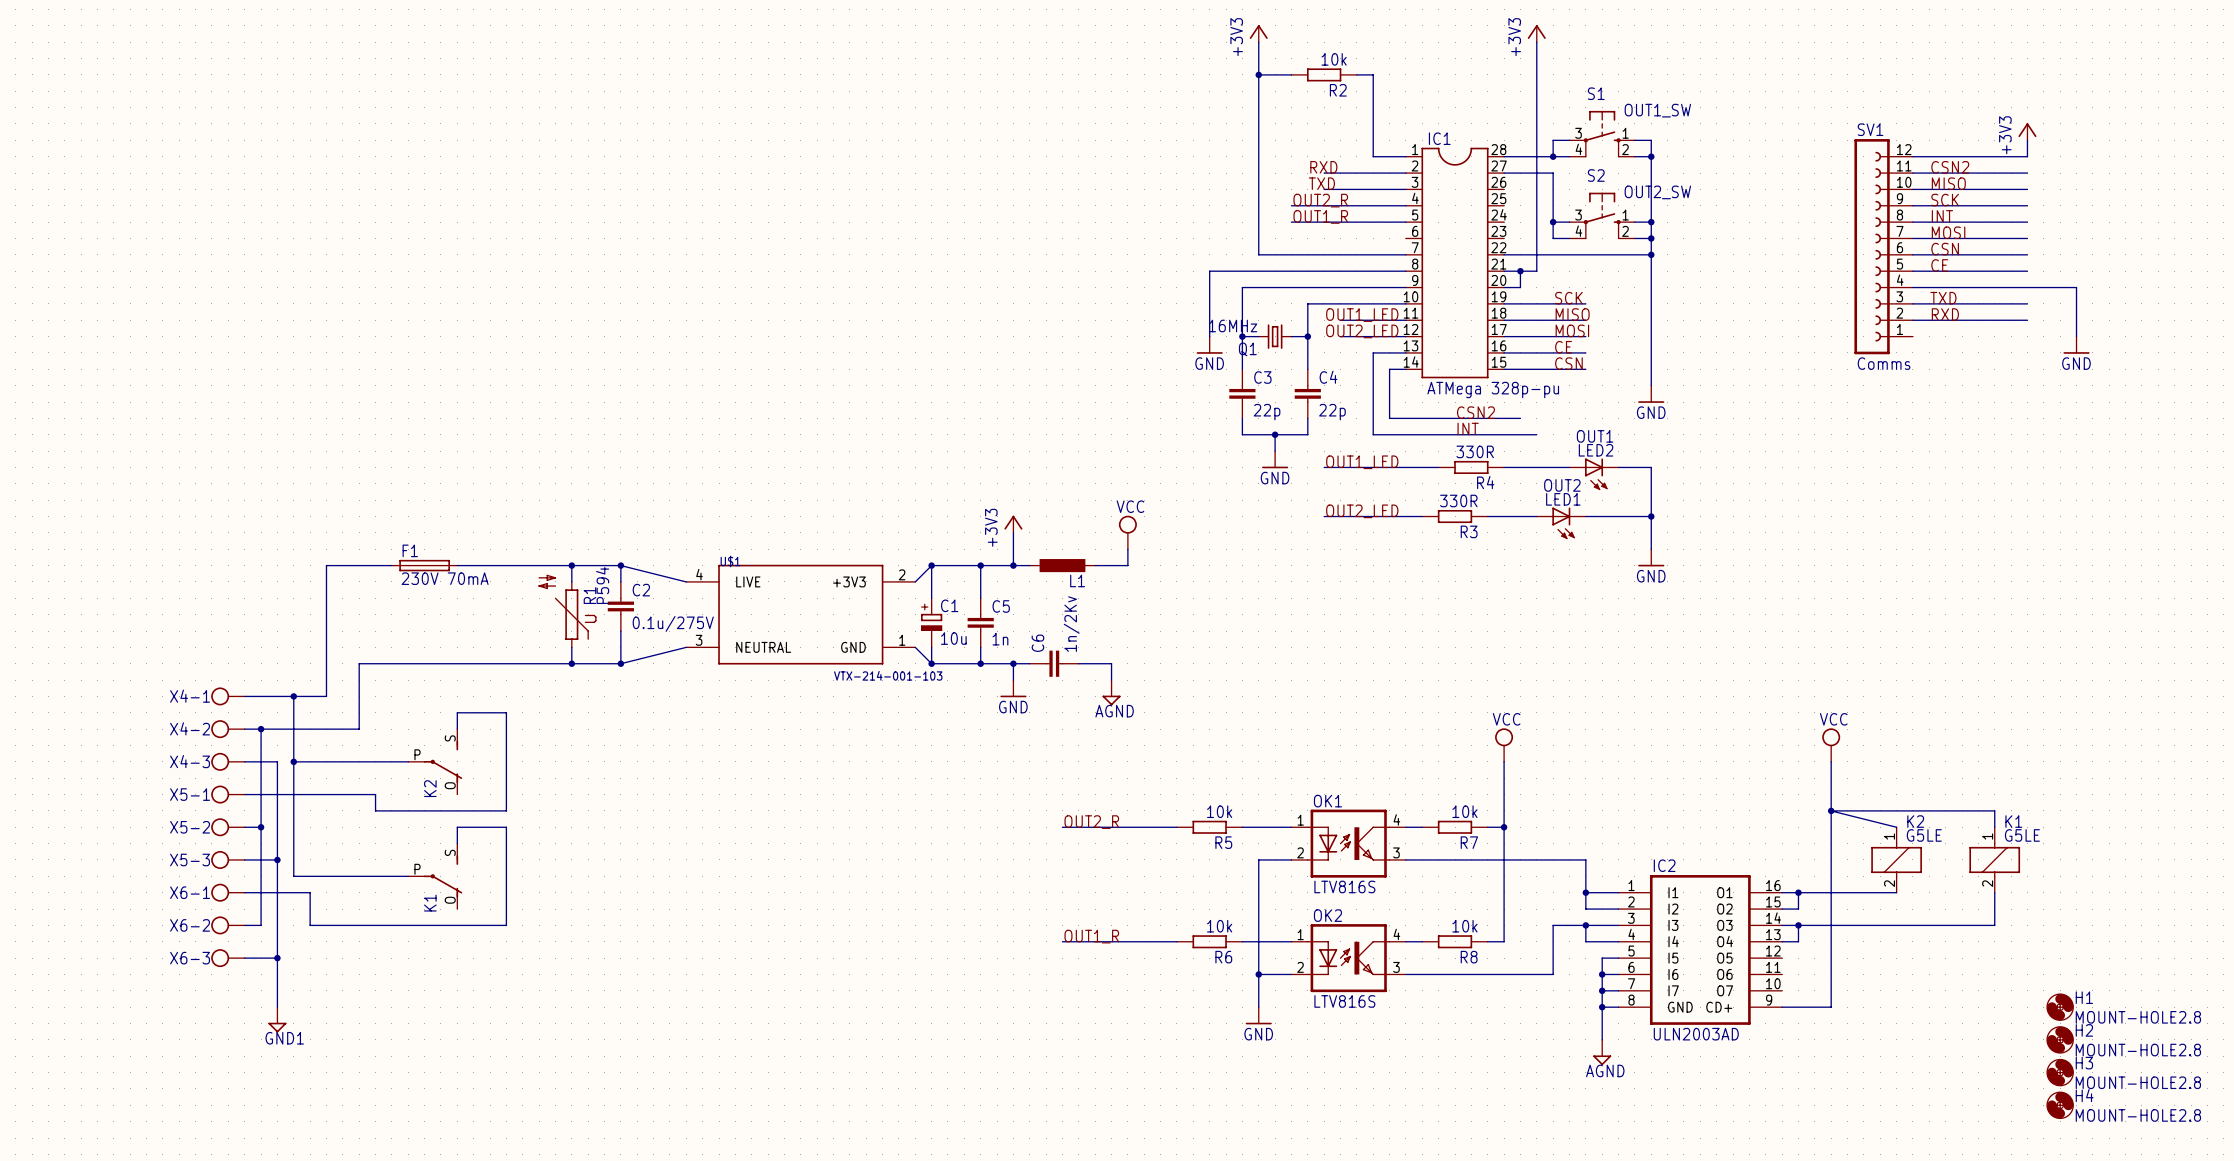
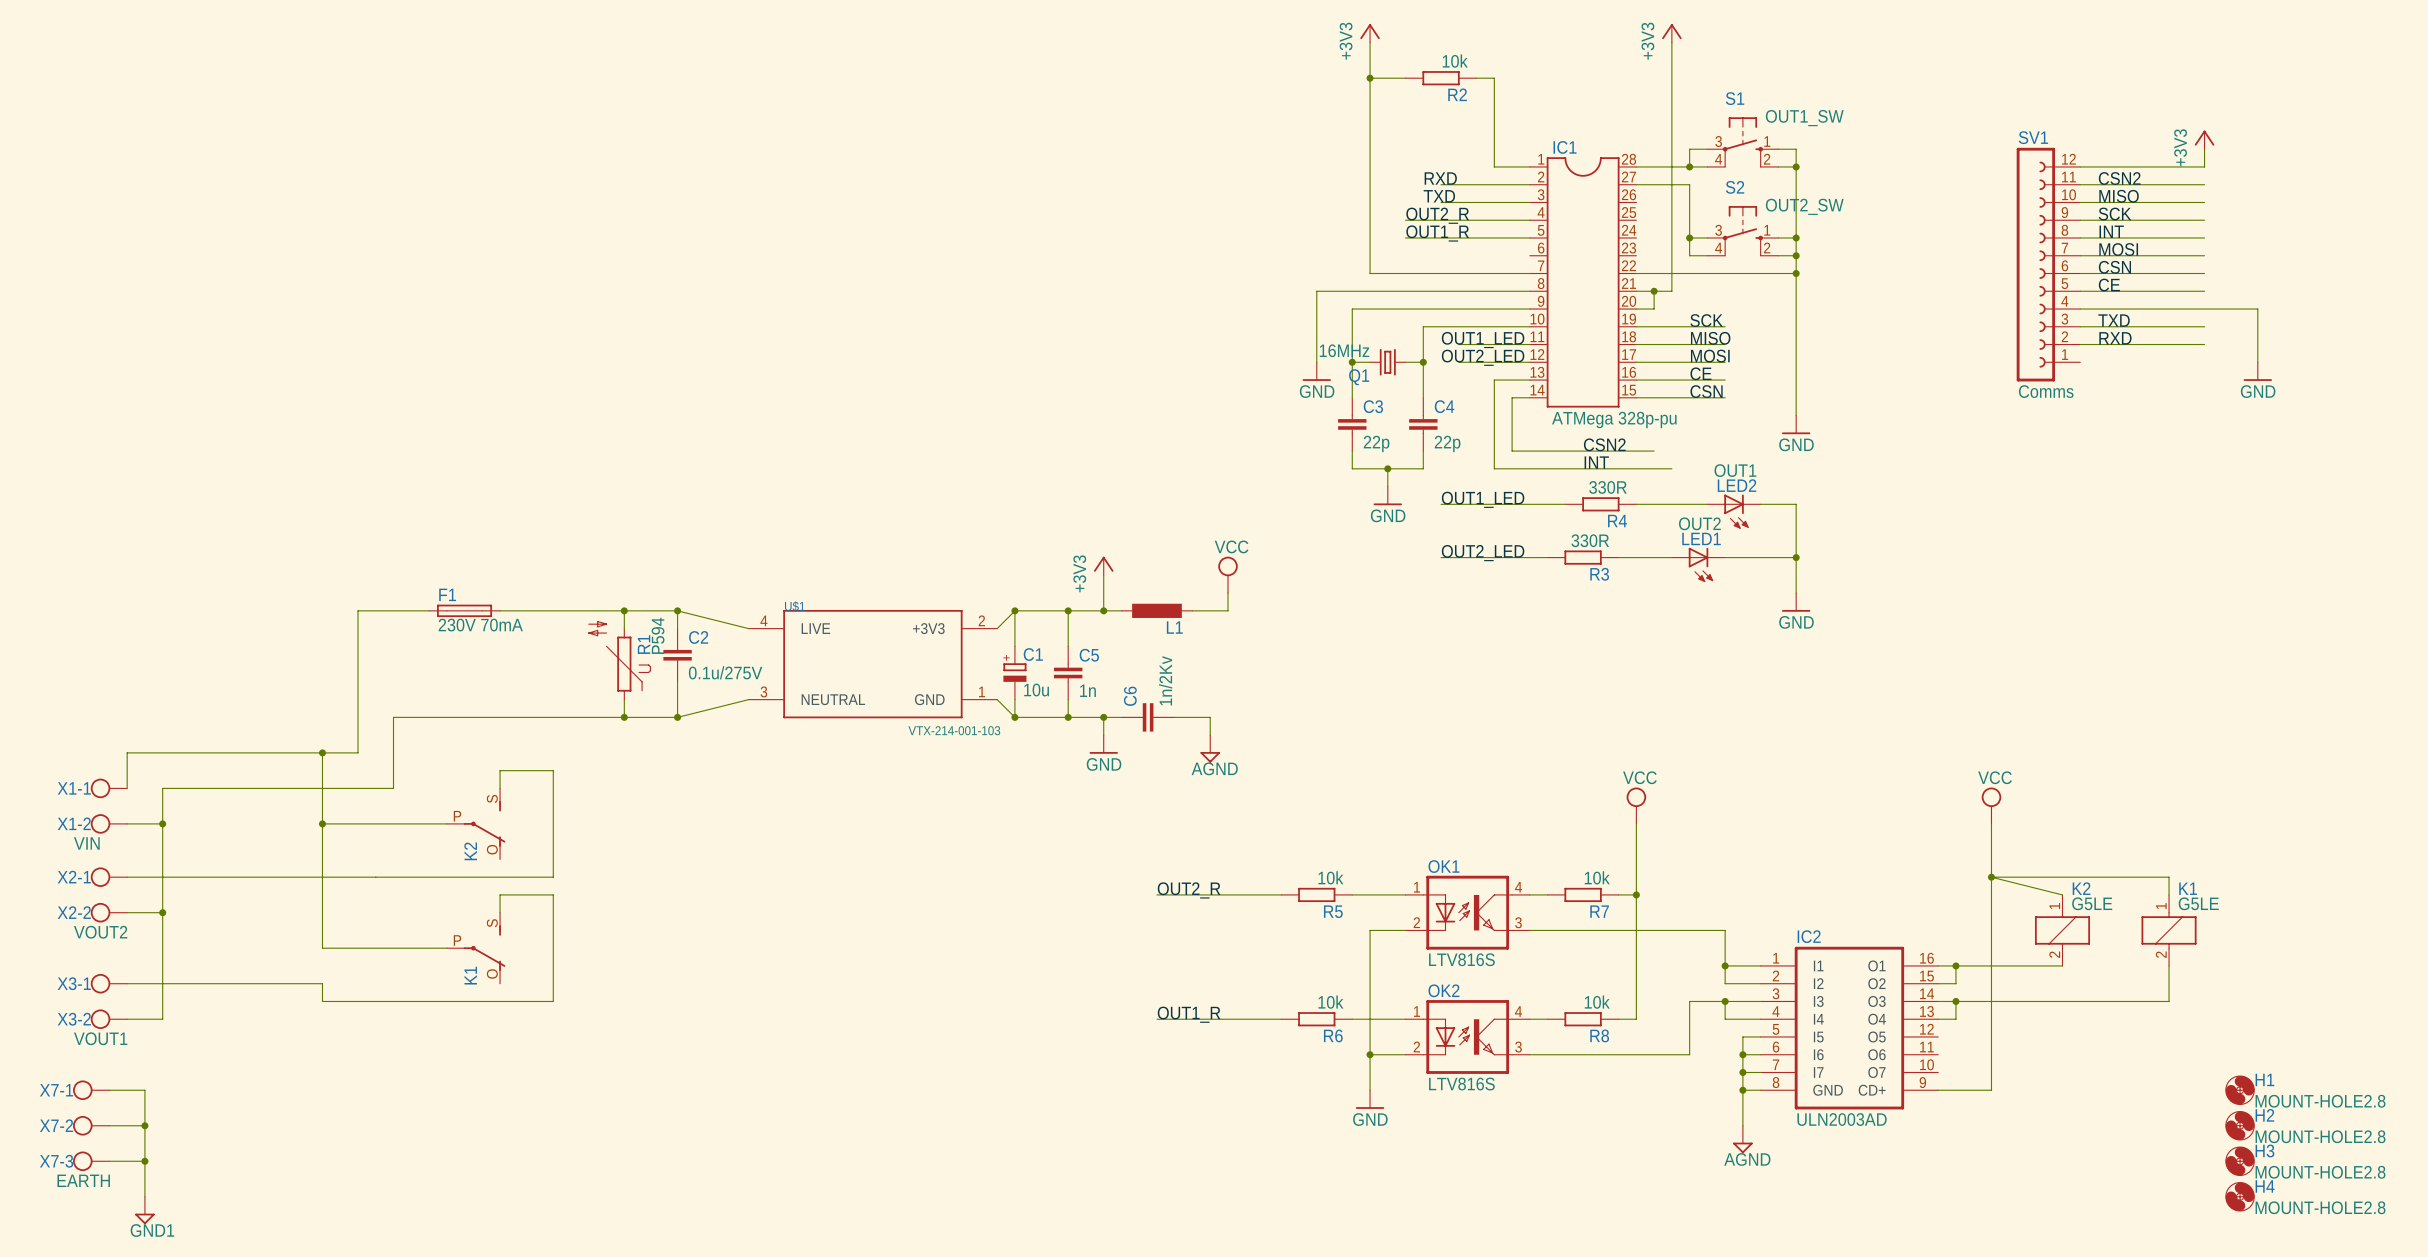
X4-1: (227, 696) -> none
wire: none -> (269, 752) (127, 752) (127, 788)
X1-1: none -> (108, 788)
X4-2: (227, 729) -> none
wire: none -> (269, 788) (162, 788) (162, 1019) (127, 1019)
wire: (261, 729) (261, 925) (244, 925) -> none
junction: (261, 729) -> none
X1-2: none -> VIN (108, 823)
wire: none -> (127, 823) (162, 823)
junction: none -> (162, 823)
X4-3: (227, 761) -> none
wire: (244, 761) (277, 761) (277, 1007) -> none
X5-1: (227, 794) -> none
wire: (244, 794) (375, 794) (375, 810) -> (127, 877) (411, 877)
X2-1: none -> (108, 877)
X5-2: (227, 827) -> none
wire: (244, 827) (261, 827) -> none
junction: (261, 827) -> none
X2-2: none -> VOUT2 (108, 912)
junction: none -> (162, 912)
X5-3: (227, 859) -> none
wire: (244, 859) (277, 859) -> (127, 912) (162, 912)
junction: (277, 859) -> none
X6-1: (227, 892) -> none
wire: (244, 892) (310, 892) (310, 925) -> (127, 983) (322, 983) (322, 1001) (340, 1001)
X3-1: none -> (108, 983)
X6-2: (227, 925) -> none
X3-2: none -> VOUT1 (108, 1019)
X6-3: (227, 958) -> none
wire: (244, 958) (277, 958) -> none
junction: (277, 958) -> none
X7-1: none -> (91, 1090)
wire: none -> (109, 1090) (144, 1090) (144, 1196)
power symbol: GND1 (277, 1019) -> none
X7-2: none -> (91, 1125)
wire: none -> (109, 1125) (144, 1125)
junction: none -> (144, 1125)
X7-3: none -> EARTH (91, 1161)
wire: none -> (109, 1161) (144, 1161)
junction: none -> (144, 1161)
power symbol: none -> GND1 (144, 1210)

